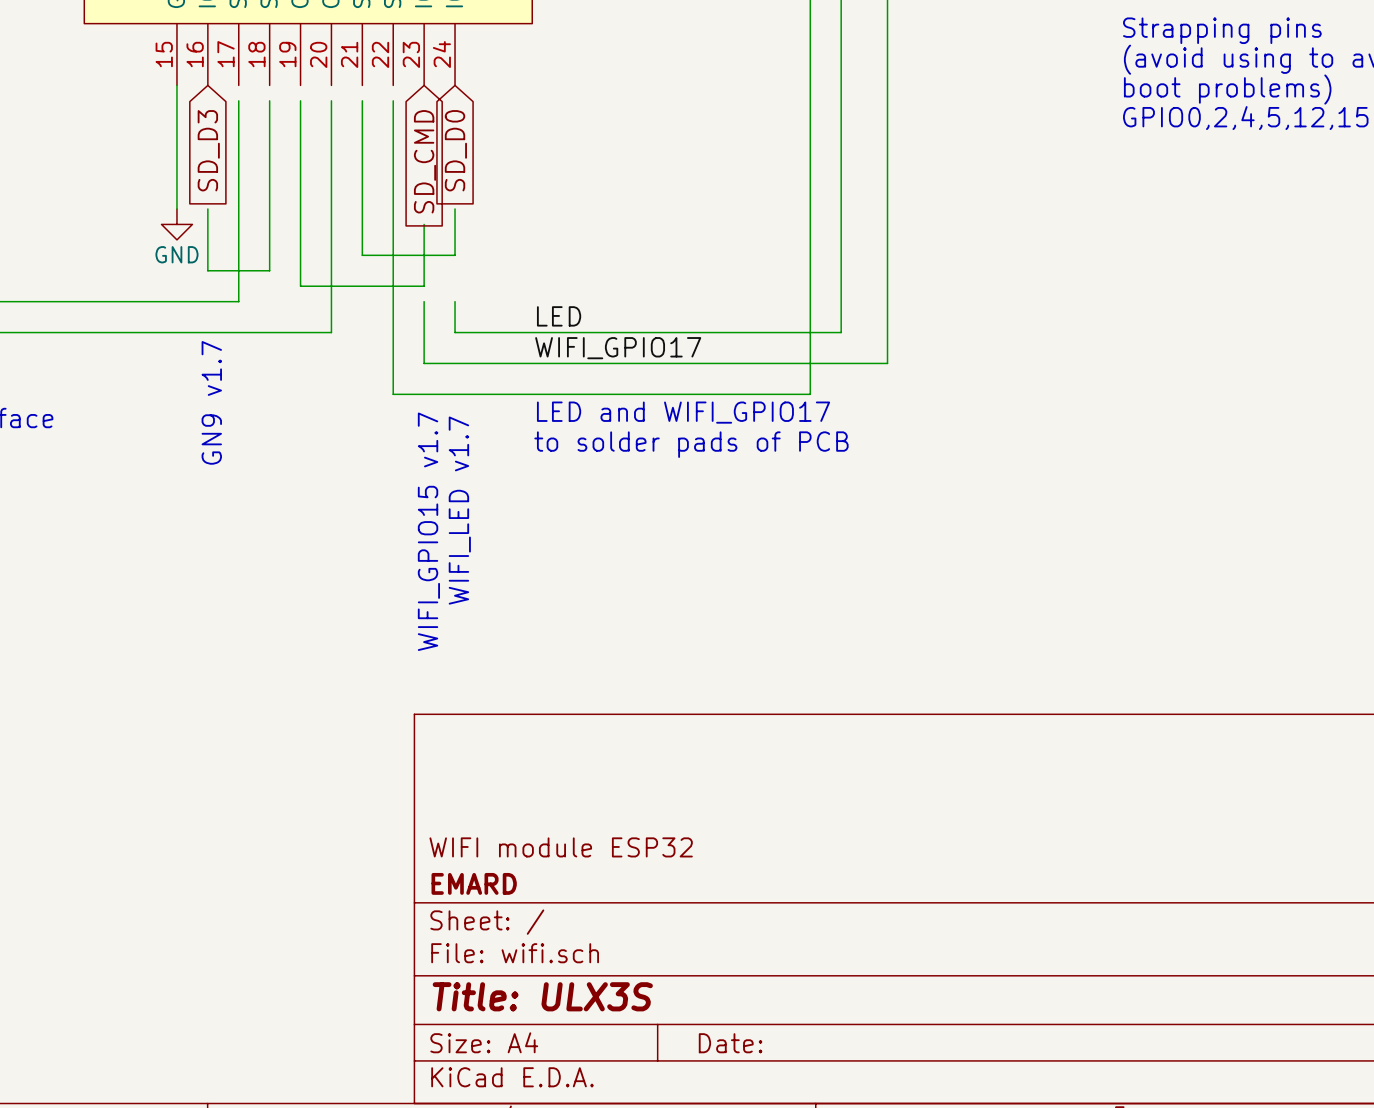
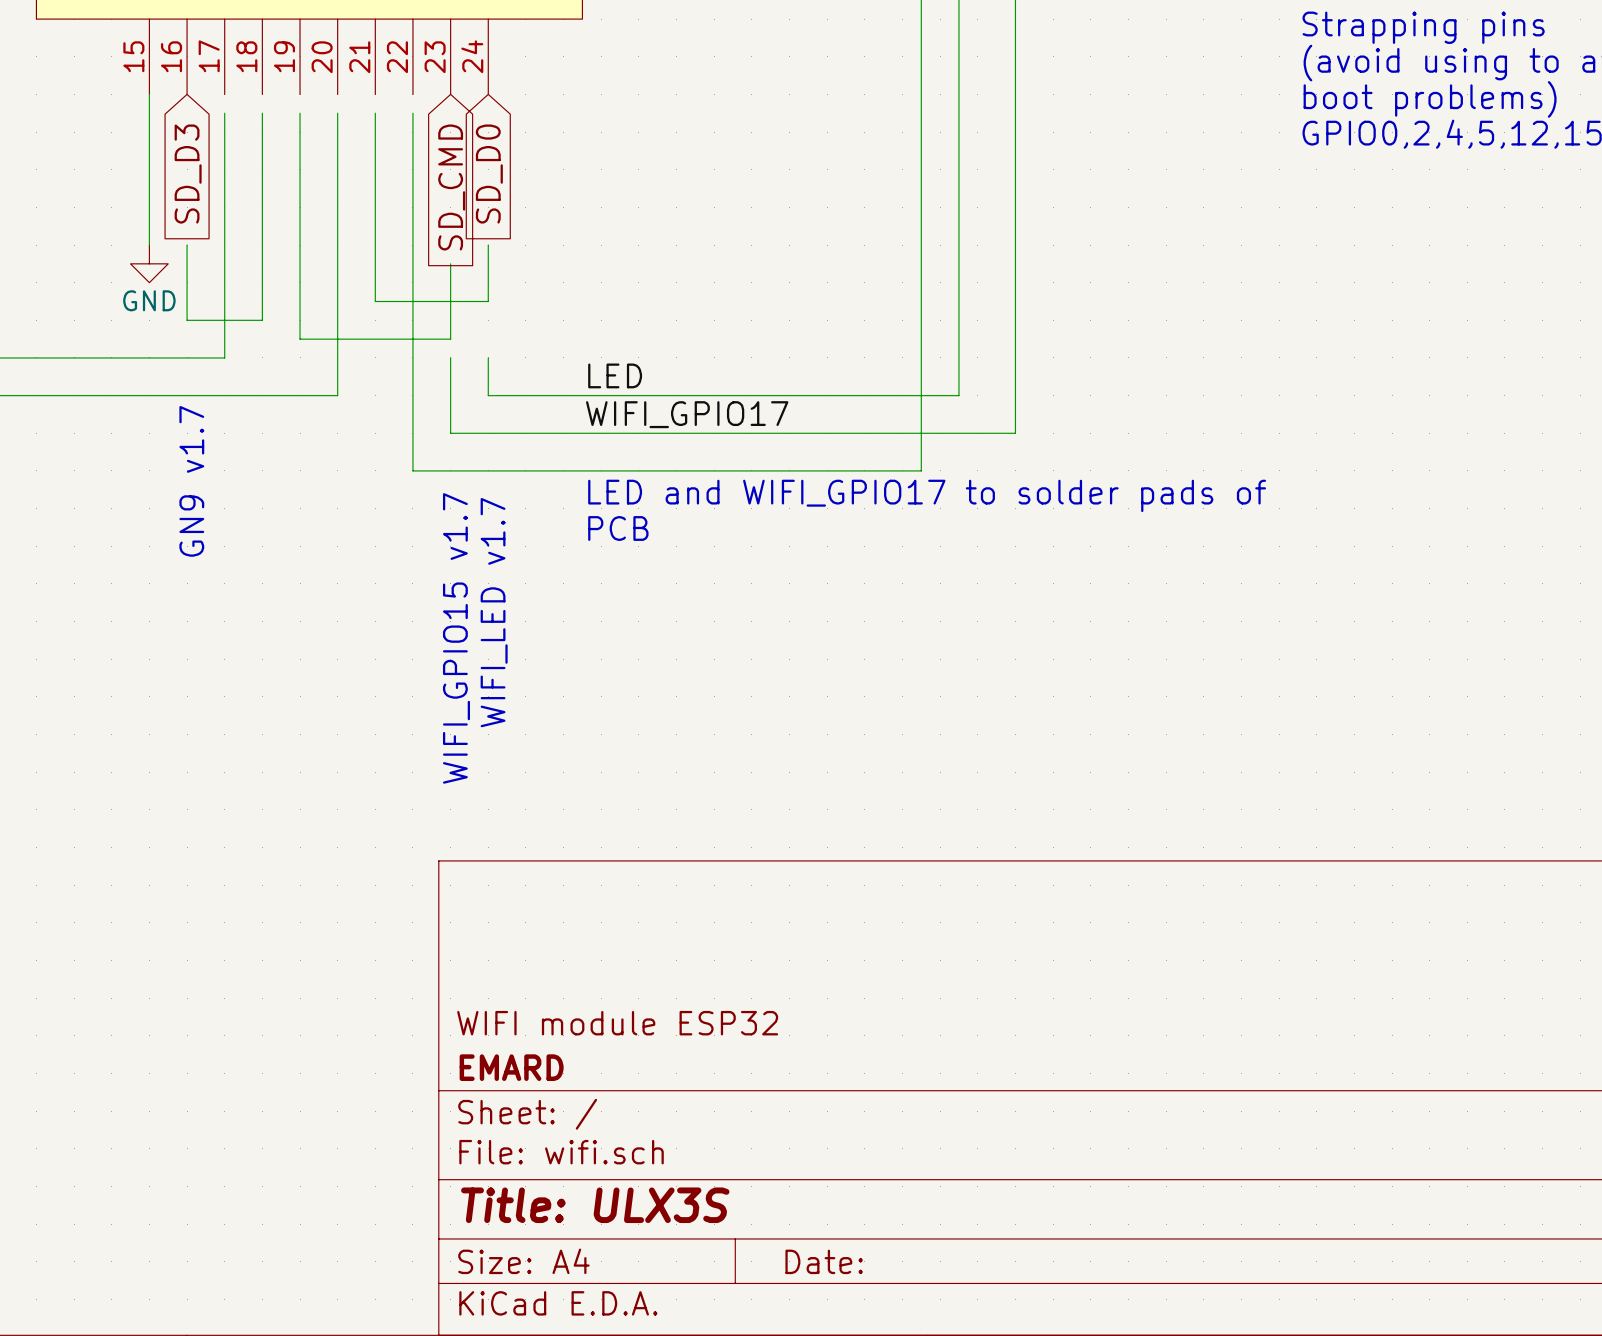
text: LED and WIFI_GPIO17 (683, 412) -> LED and WIFI_GPIO17 to solder pads of (927, 495)
text: to solder pads of PCB (691, 444) -> PCB (618, 528)

